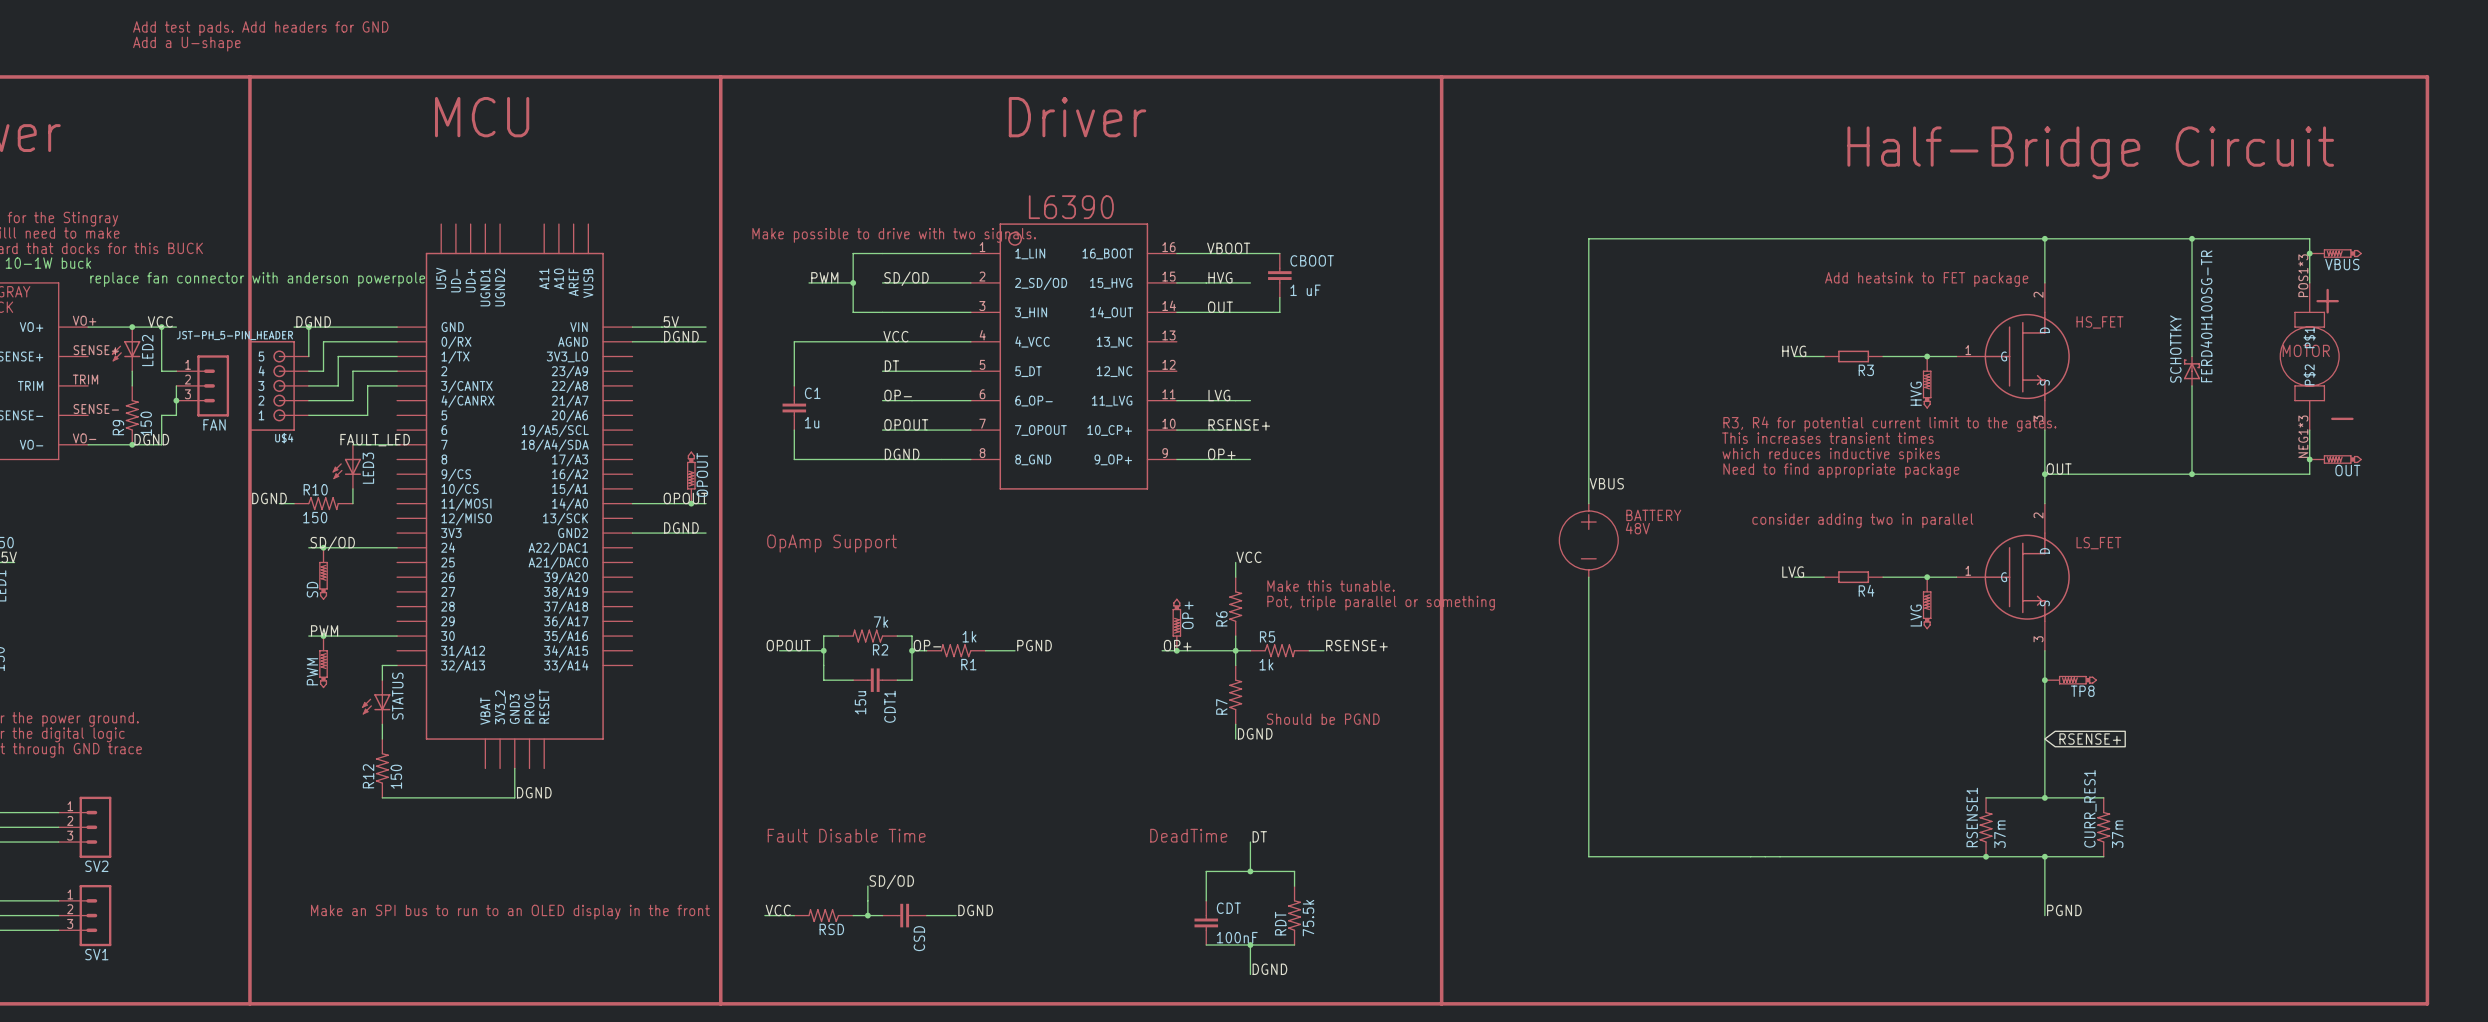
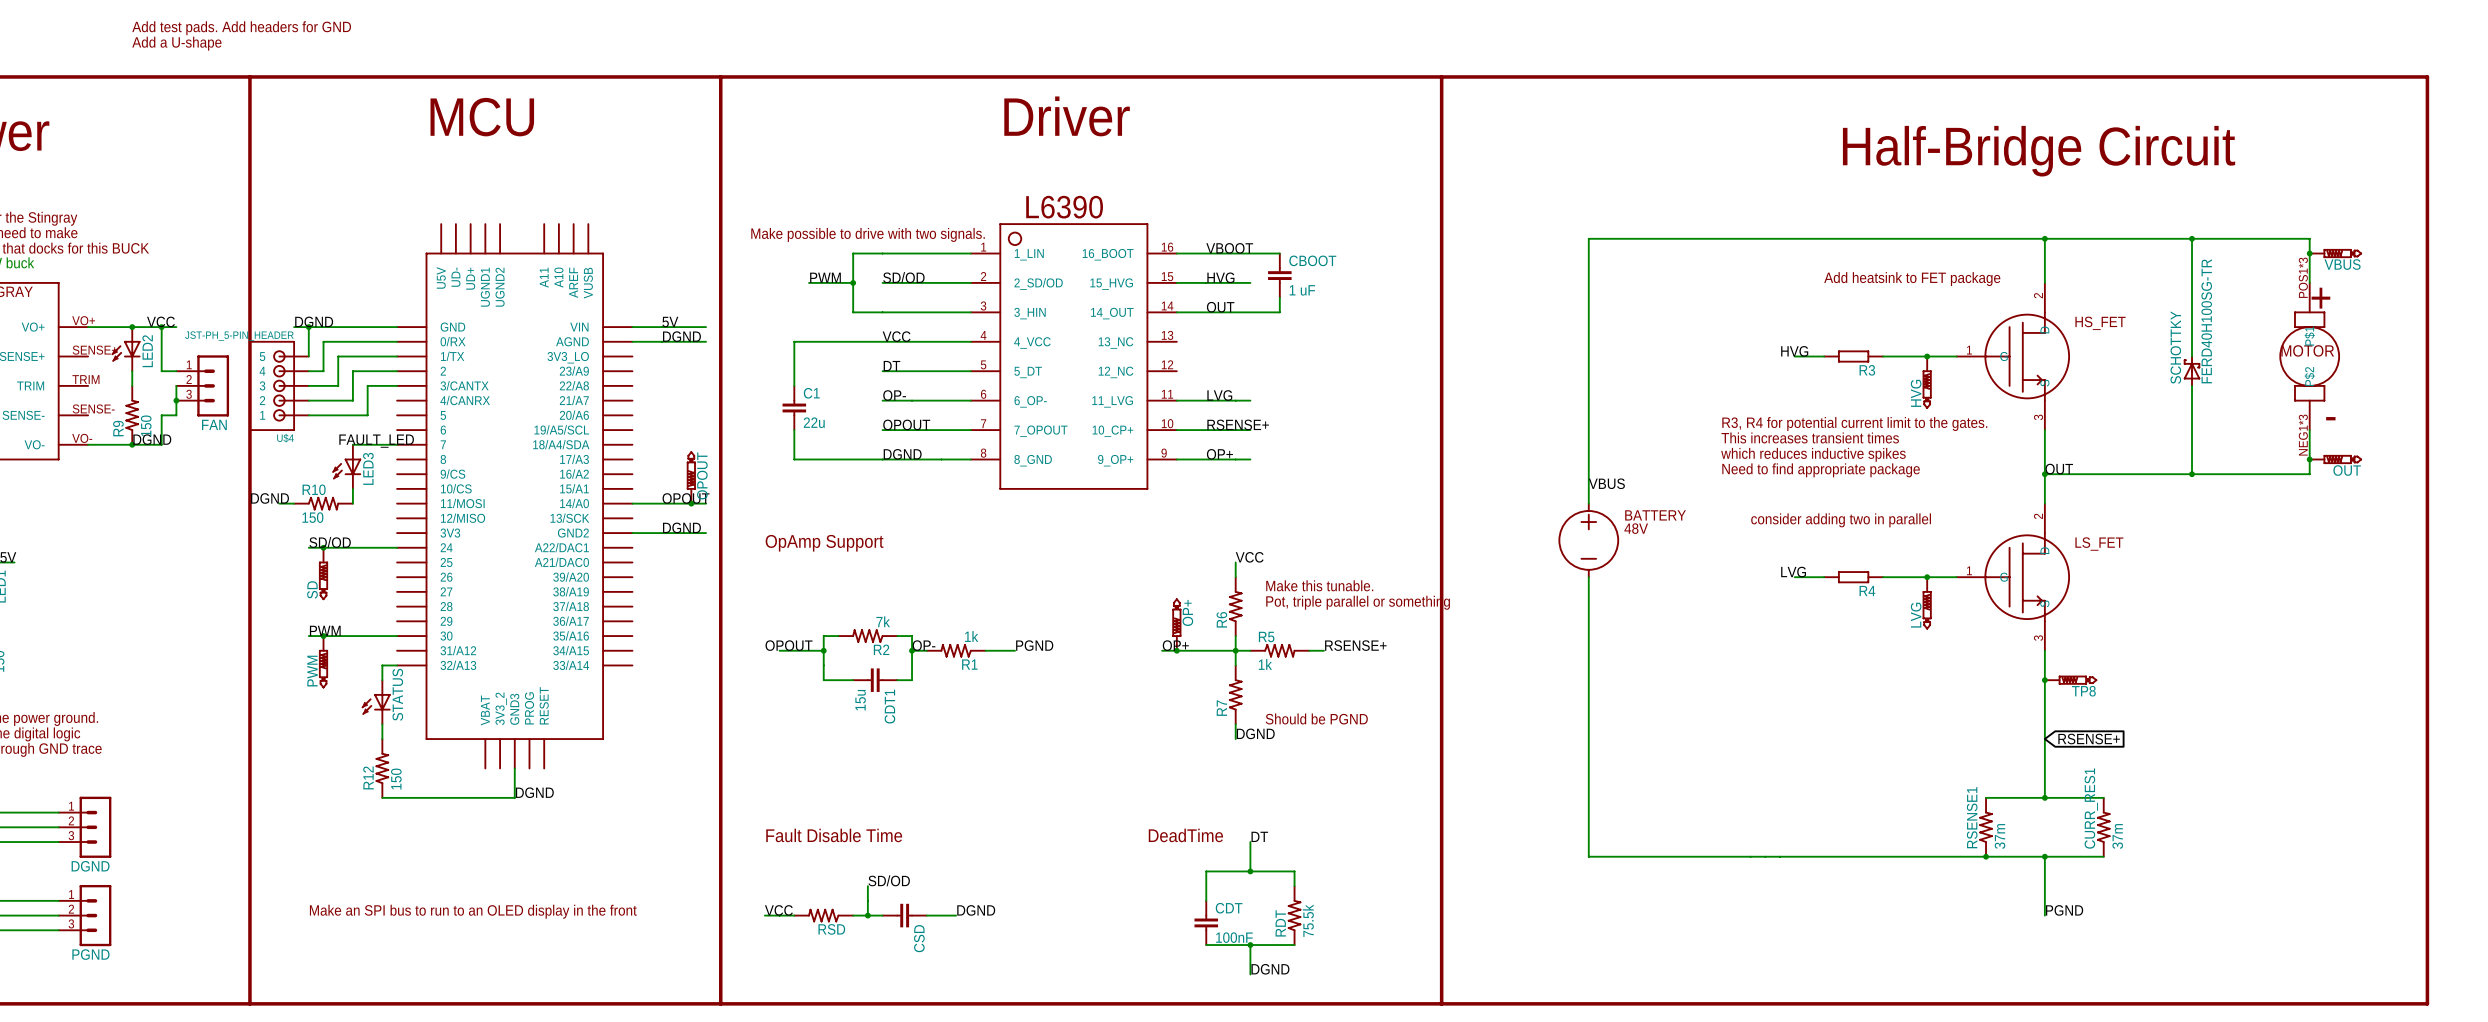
text: replace fan connector with anderson powerpole (257, 279) -> none
C1 value: 1u (812, 422) -> 22u (814, 422)
SV2 name: SV2 (96, 866) -> DGND (90, 866)
SV1 name: SV1 (96, 954) -> PGND (90, 954)

